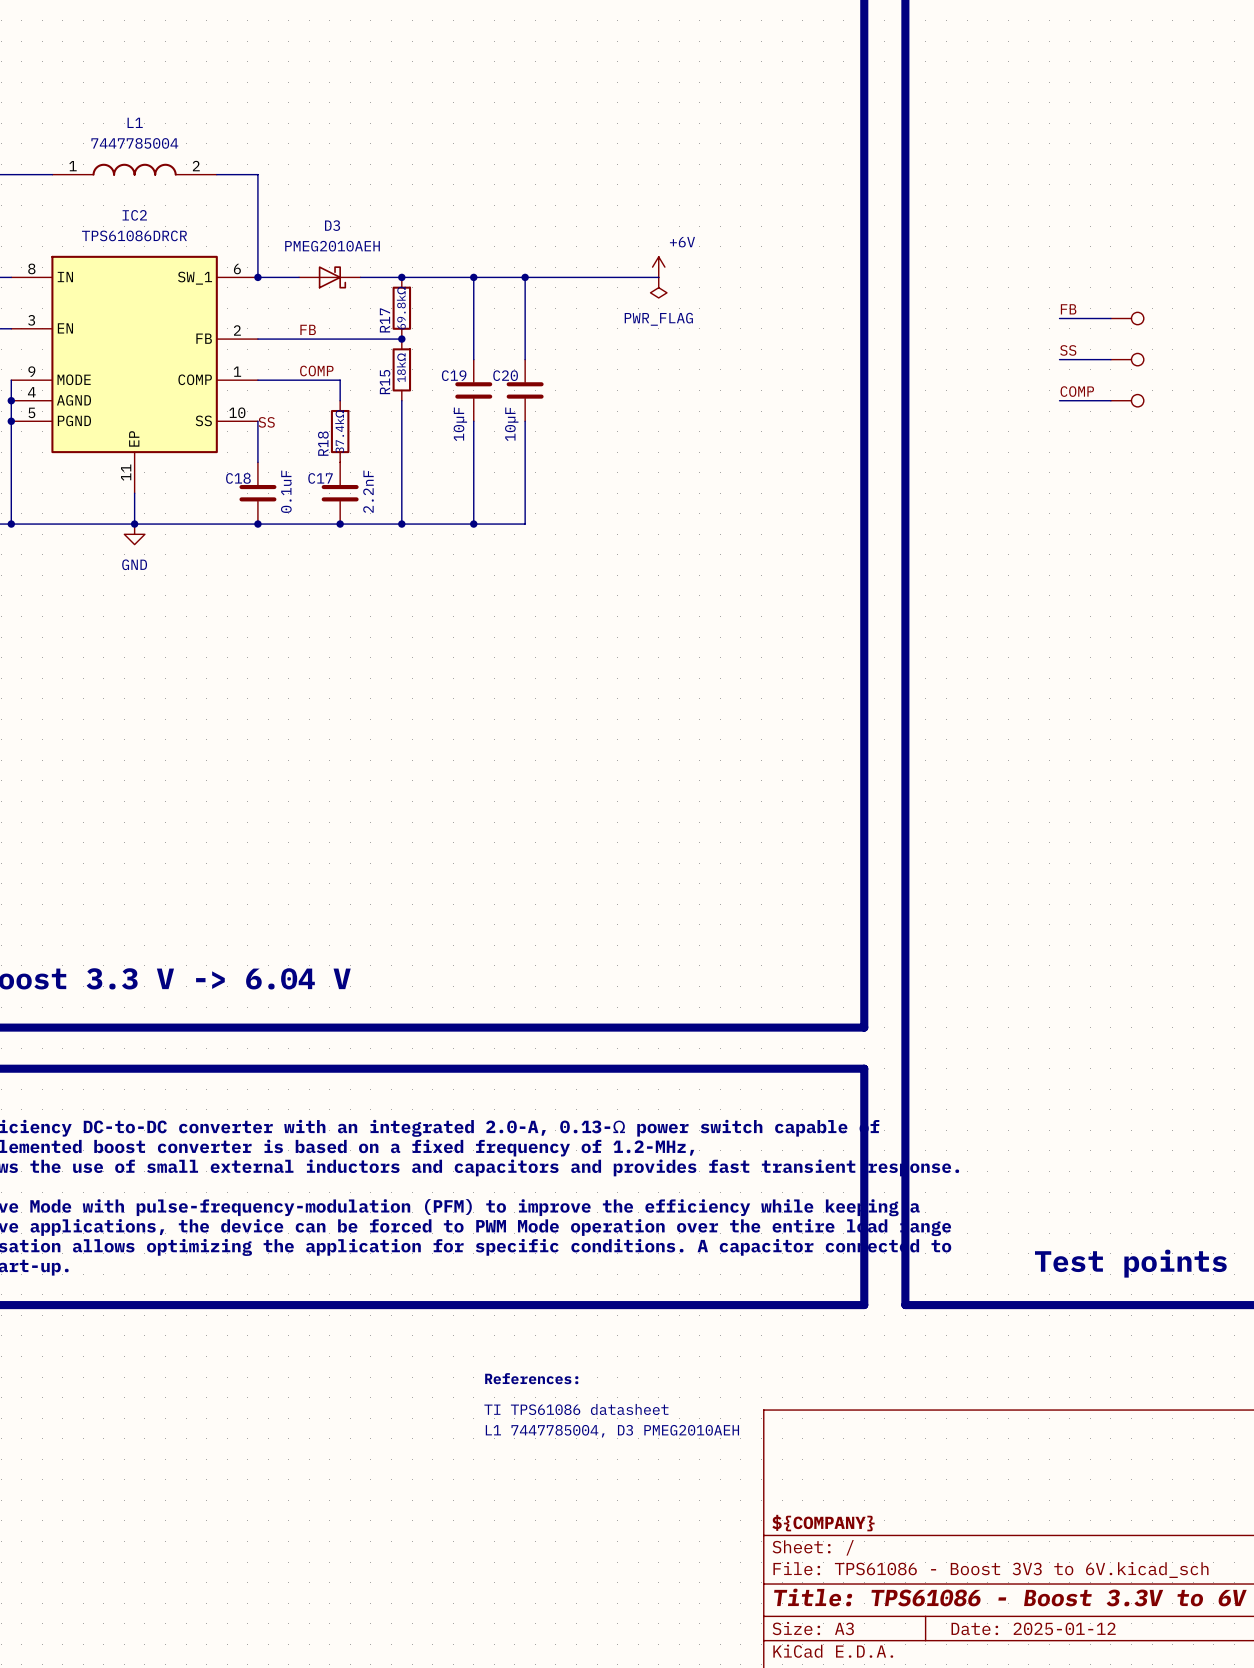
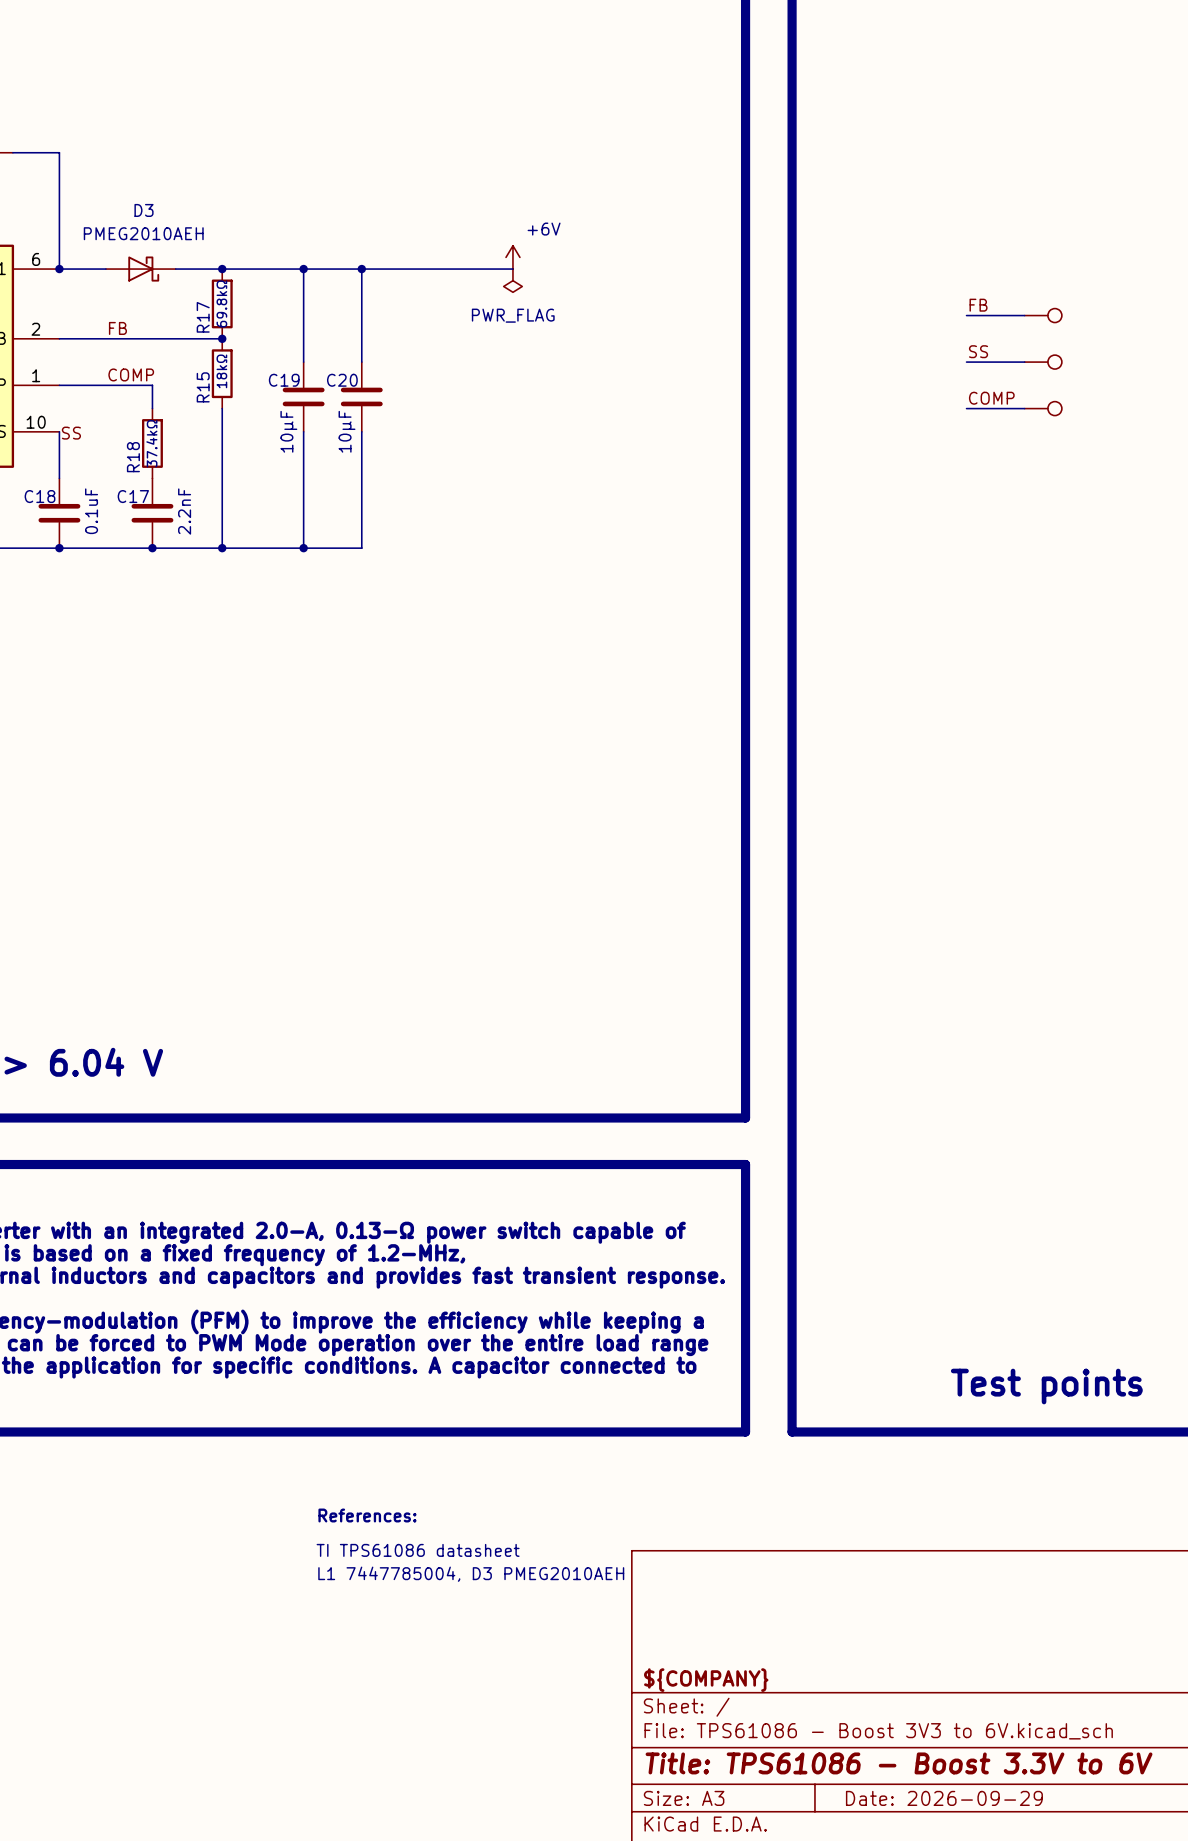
title block: Date: 2025-01-12 (1033, 1628) -> Date: 2026-09-29 (944, 1798)

